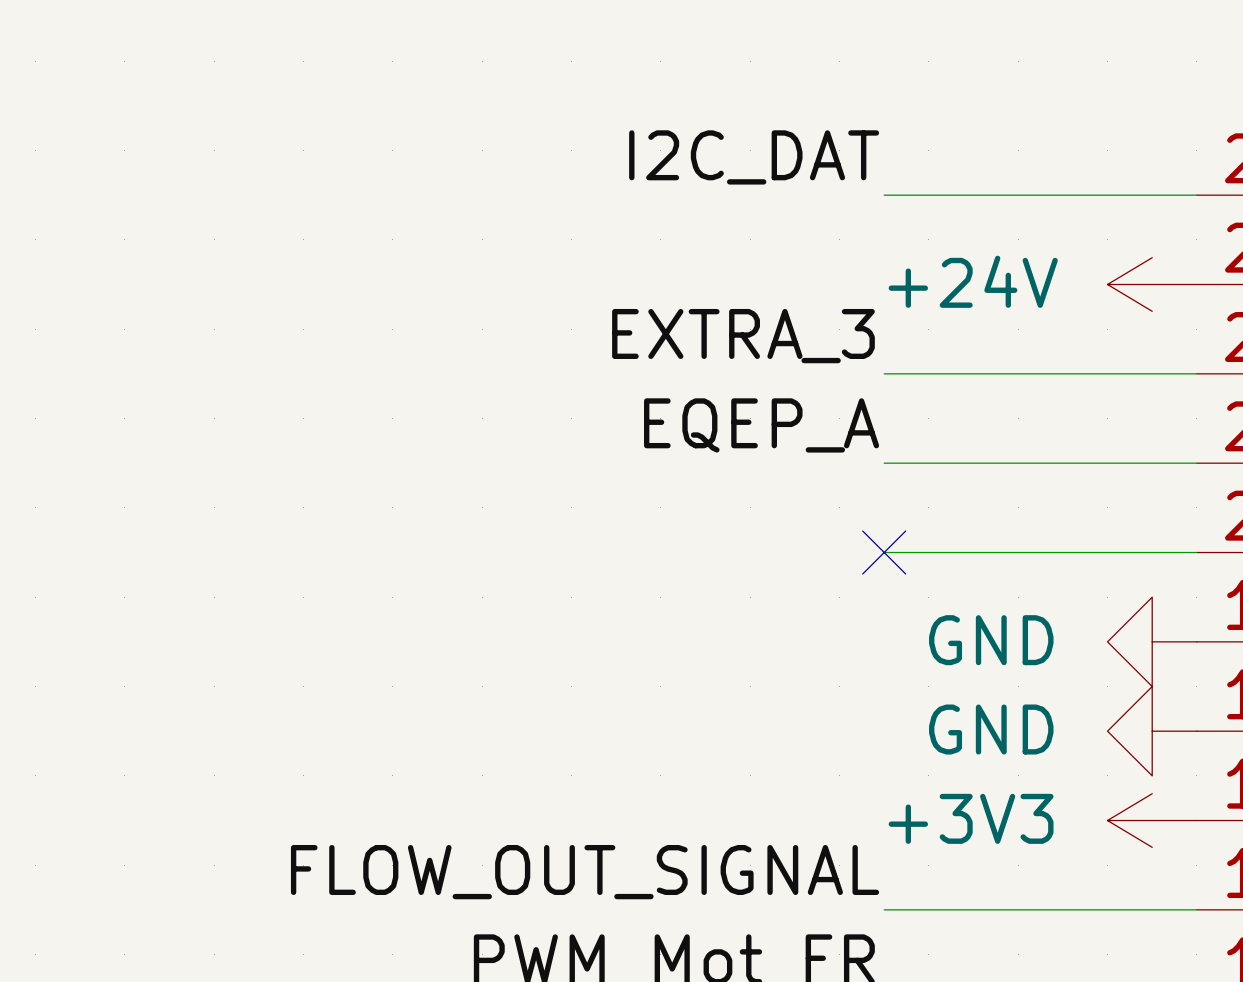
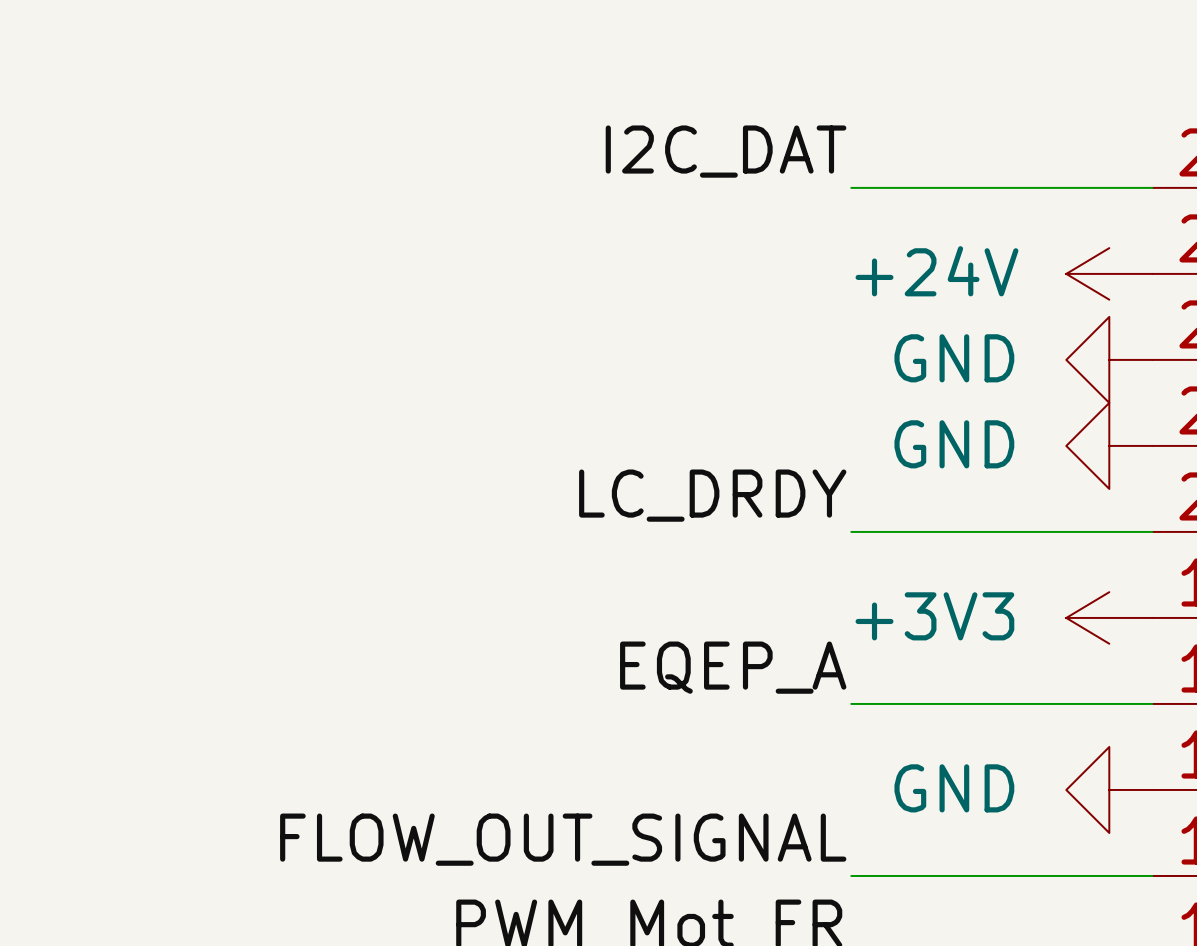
label: EXTRA_3 (743, 336) -> none
wire: (884, 373) (1196, 373) -> none
power symbol: none -> GND (1109, 359)
label position: EQEP_A (761, 425) -> EQEP_A (733, 667)
wire: (884, 463) (1196, 463) -> (851, 703) (1152, 703)
power symbol: none -> GND (1109, 445)
label: none -> LC_DRDY (712, 495)
no-connect mark: (884, 552) -> none
power symbol: GND (1152, 641) -> +3V3 (1109, 617)
power symbol: GND (1152, 731) -> none
power symbol: +3V3 (1152, 820) -> GND (1109, 789)

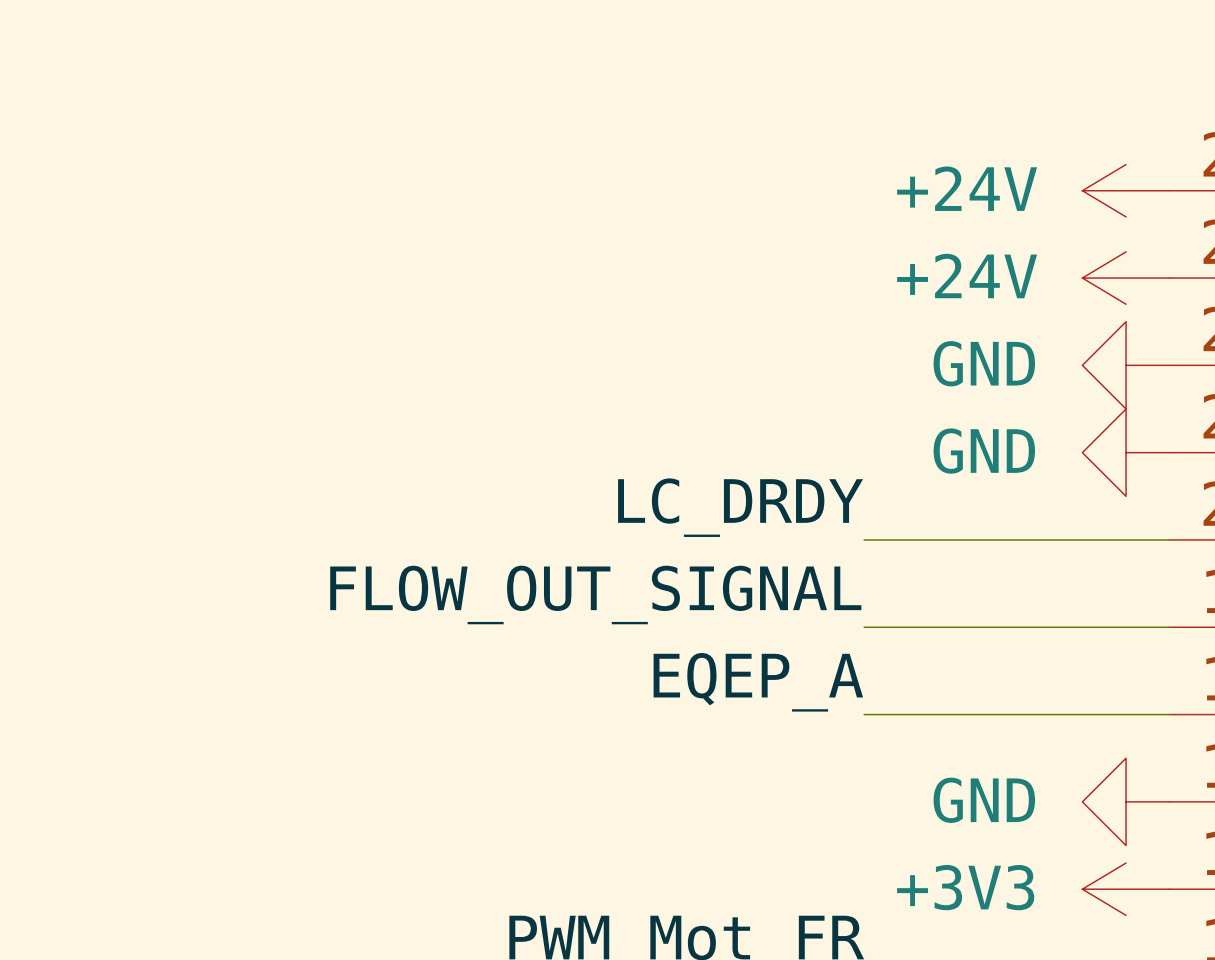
label: I2C_DAT (726, 151) -> none
wire: (851, 187) (1152, 187) -> none
power symbol: none -> +24V (1126, 190)
power symbol position: +3V3 (1109, 617) -> +3V3 (1126, 889)
label position: FLOW_OUT_SIGNAL (563, 839) -> FLOW_OUT_SIGNAL (595, 594)
wire: (851, 875) (1152, 875) -> (864, 627) (1169, 627)

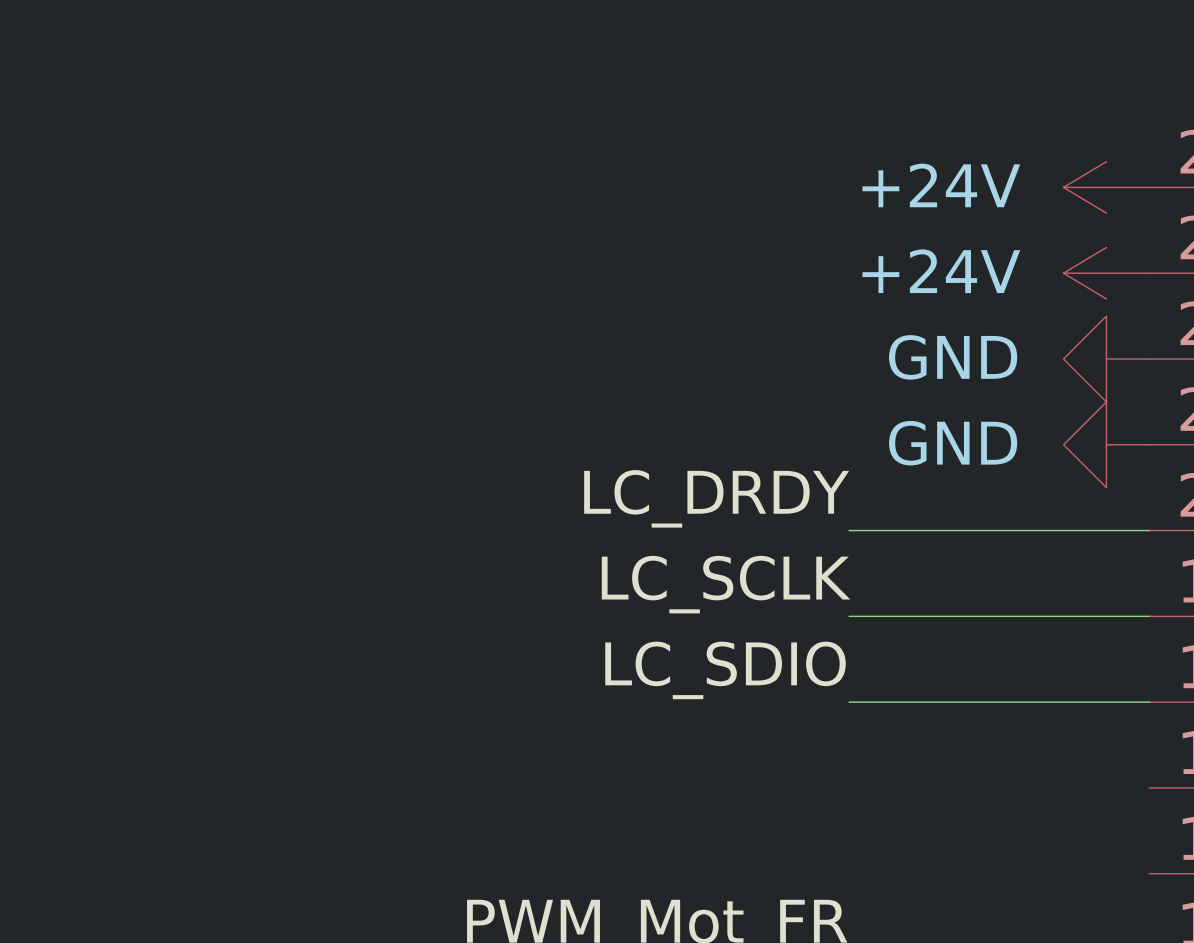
label: FLOW_OUT_SIGNAL (595, 594) -> LC_SCLK (726, 584)
label: EQEP_A (758, 682) -> LC_SDIO (725, 670)
power symbol: GND (1126, 801) -> none
power symbol: +3V3 (1126, 889) -> none

